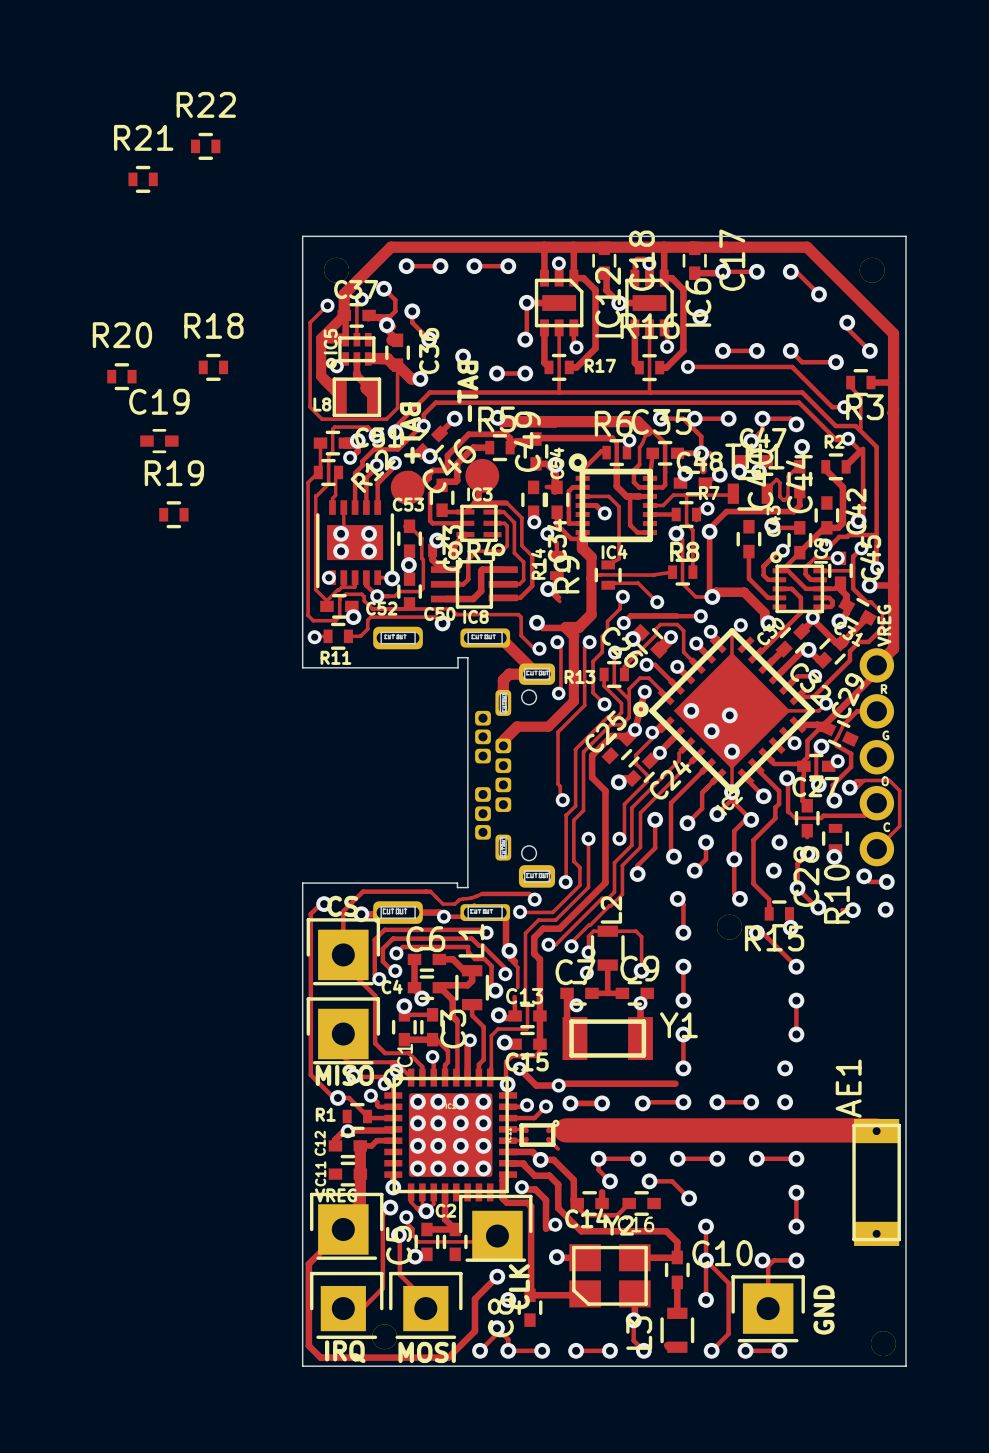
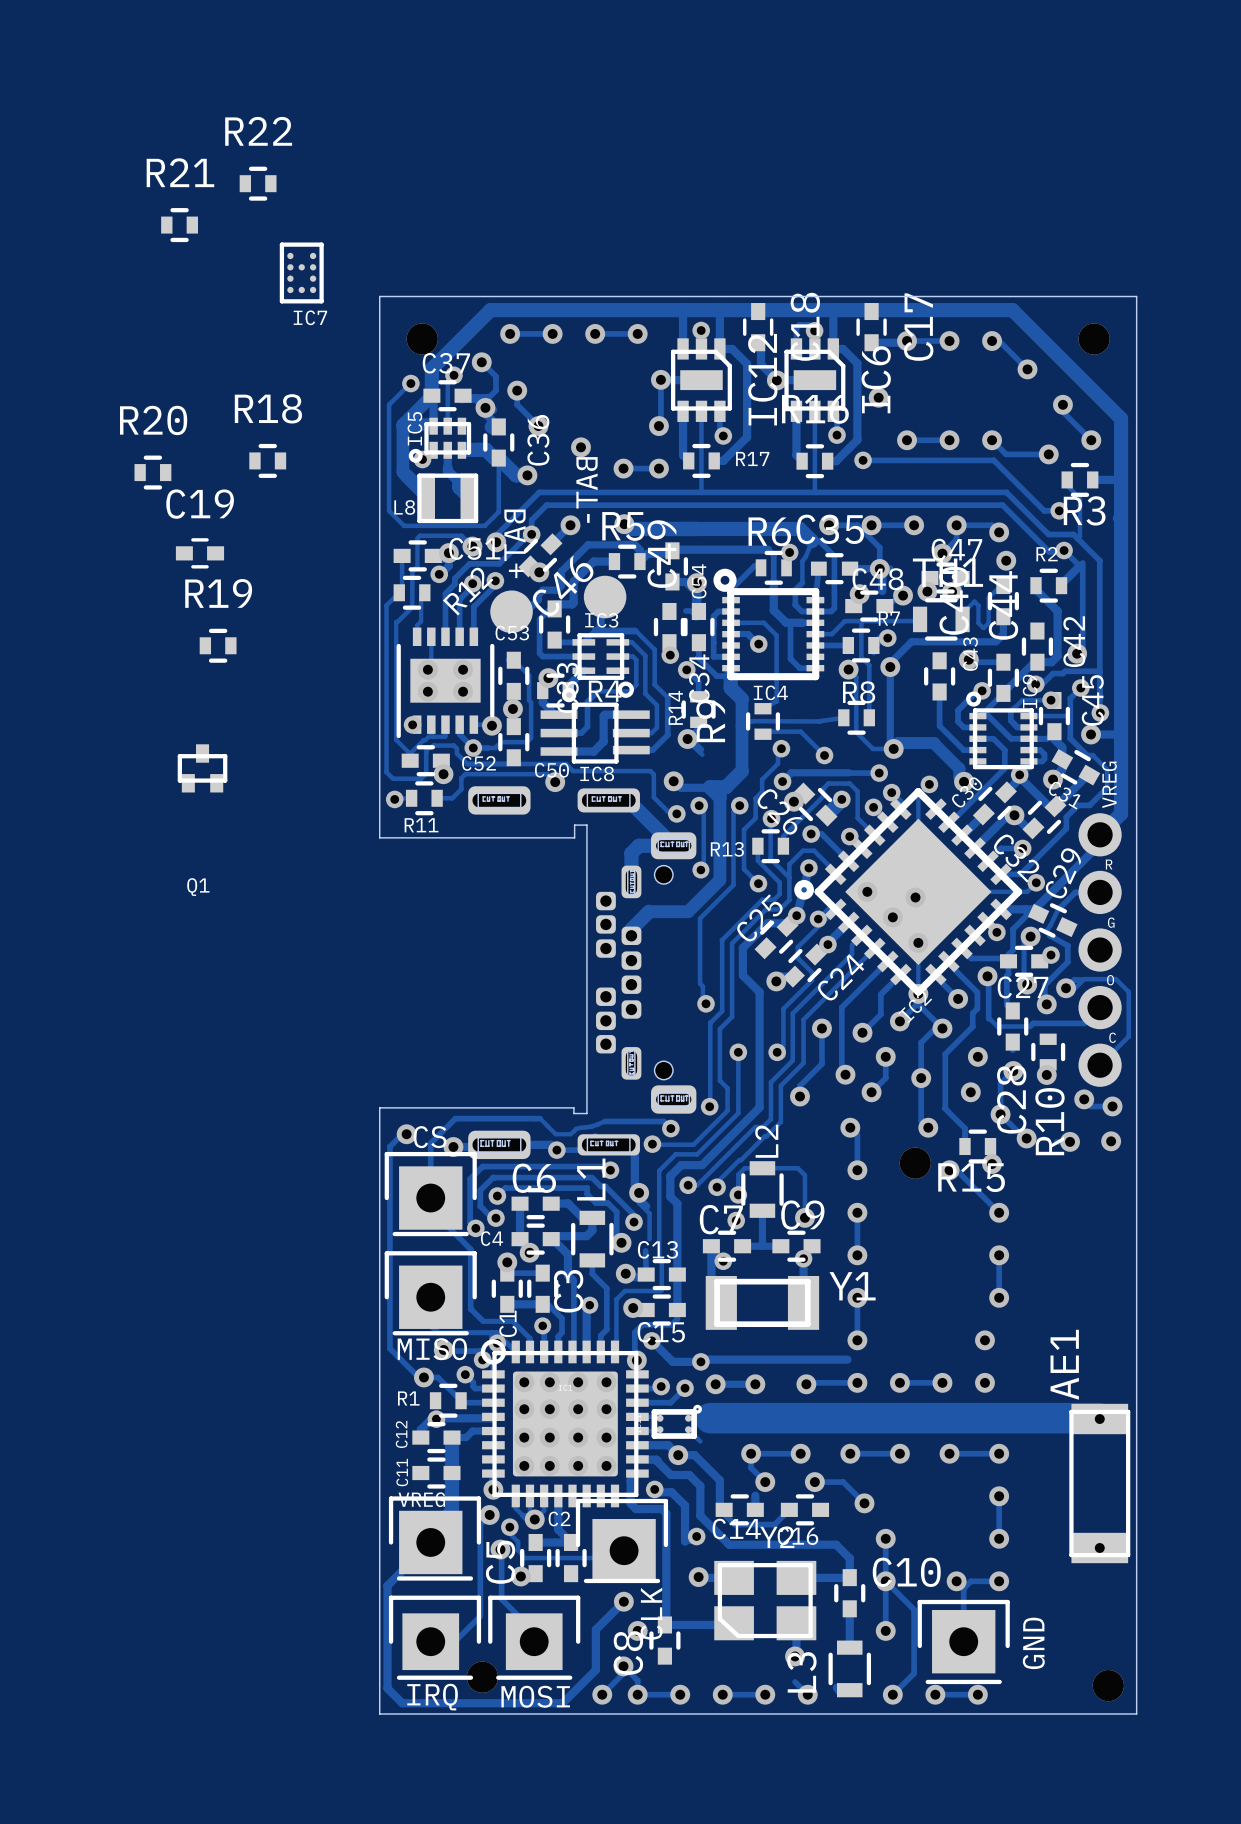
IC7: none -> (301, 272)
Q1: none -> (202, 768)
track: (633, 1320) (633, 1340) -> none

